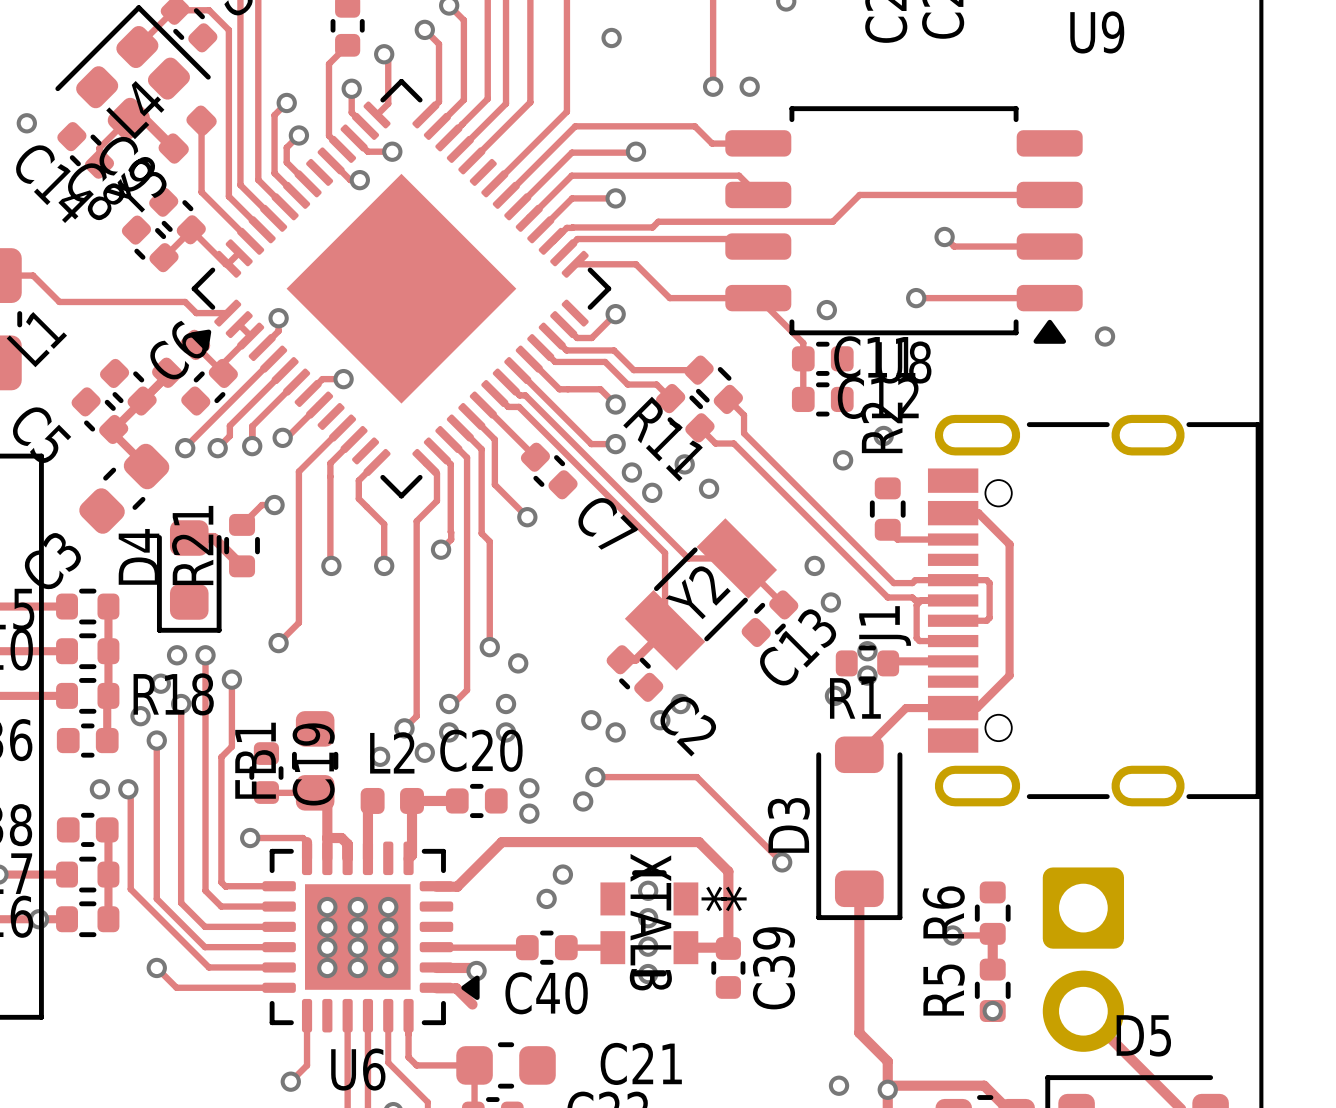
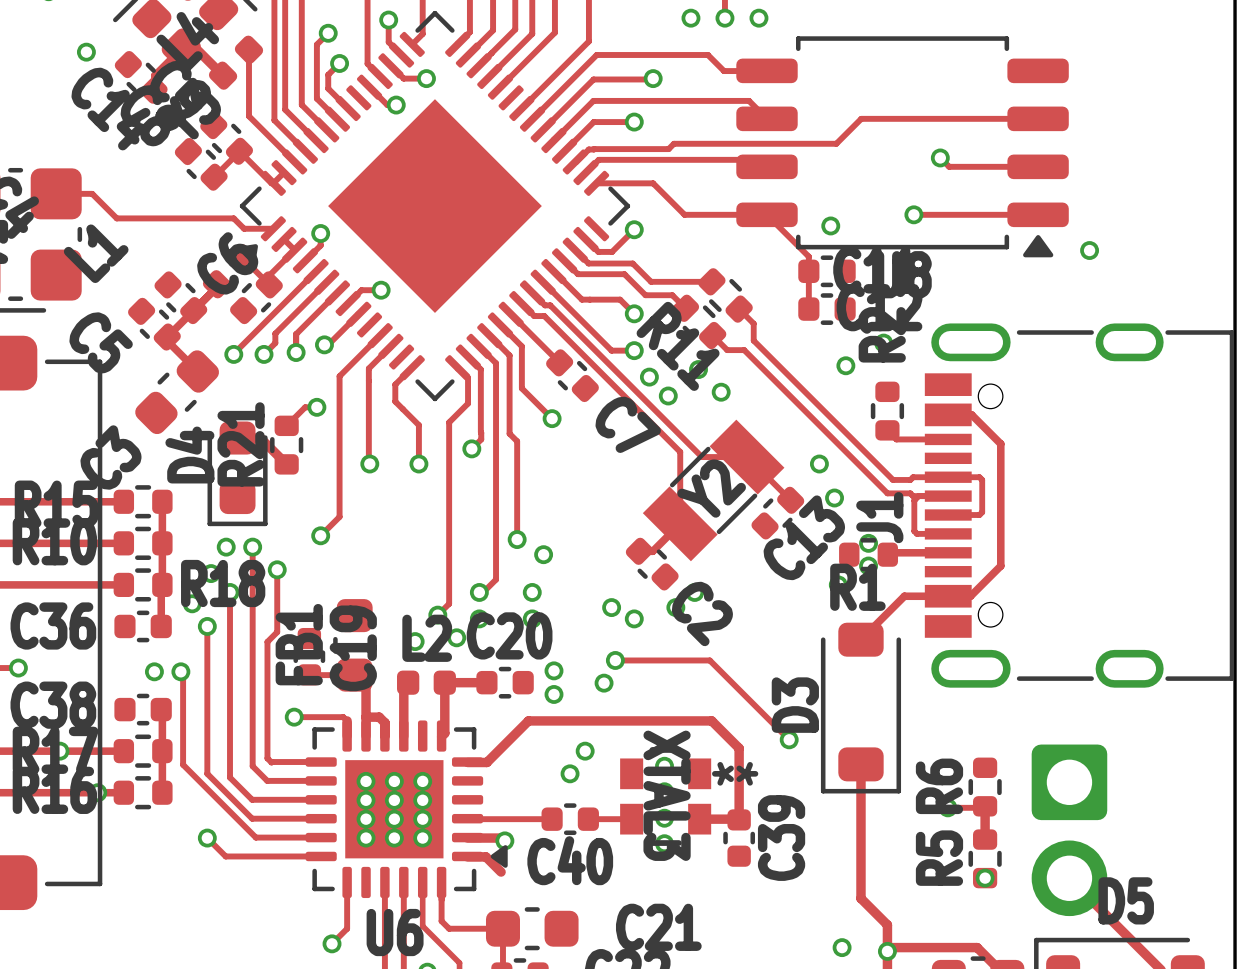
via: none -> (690, 18)

